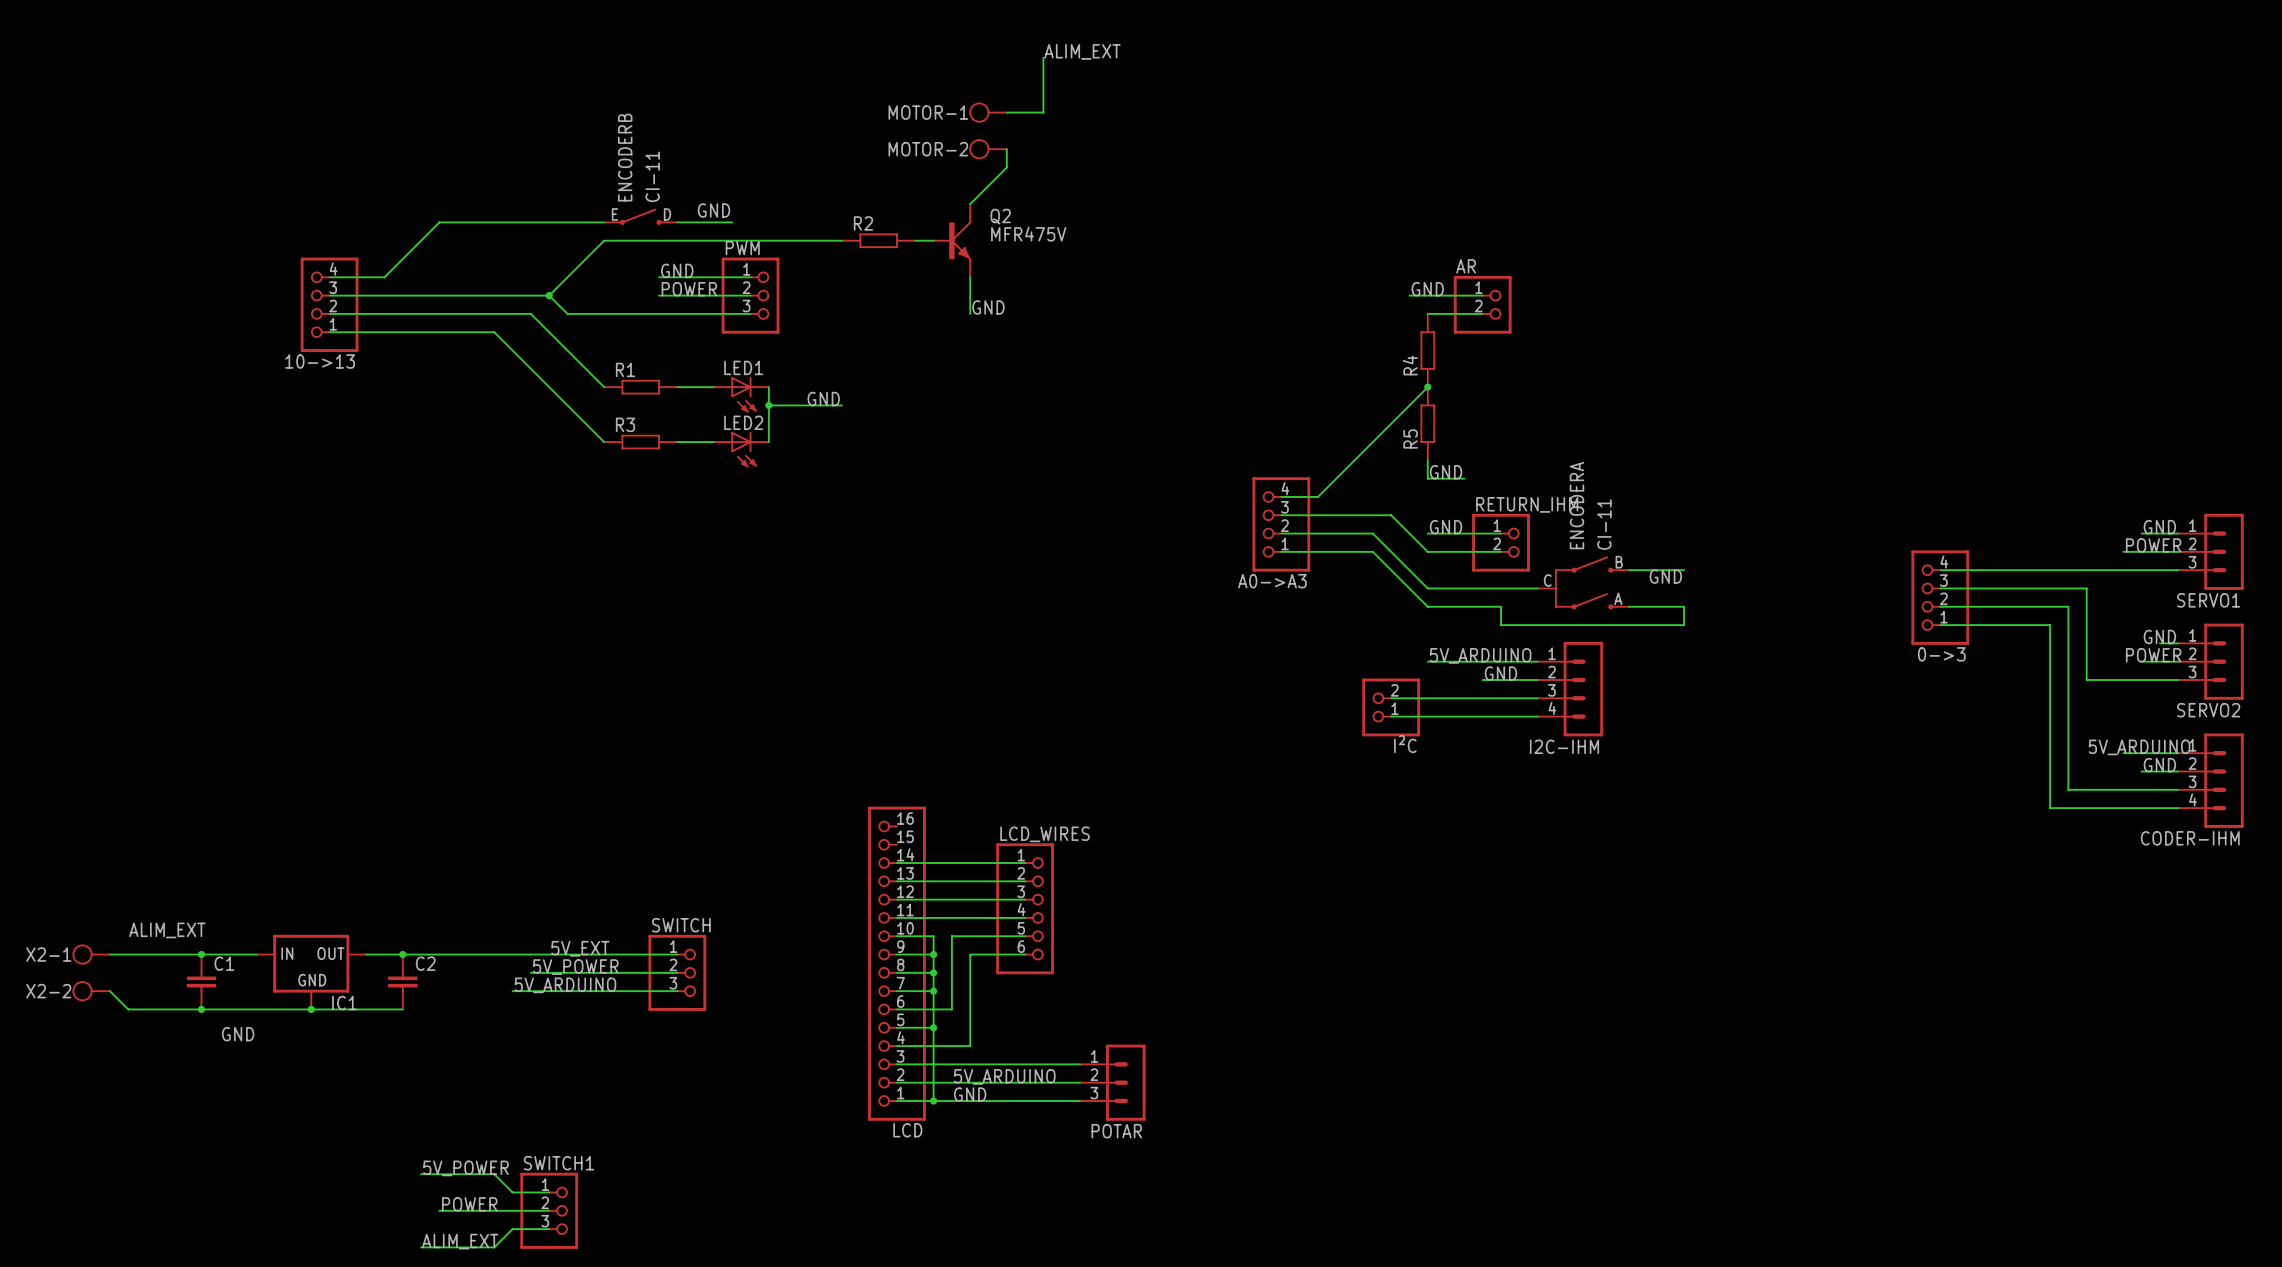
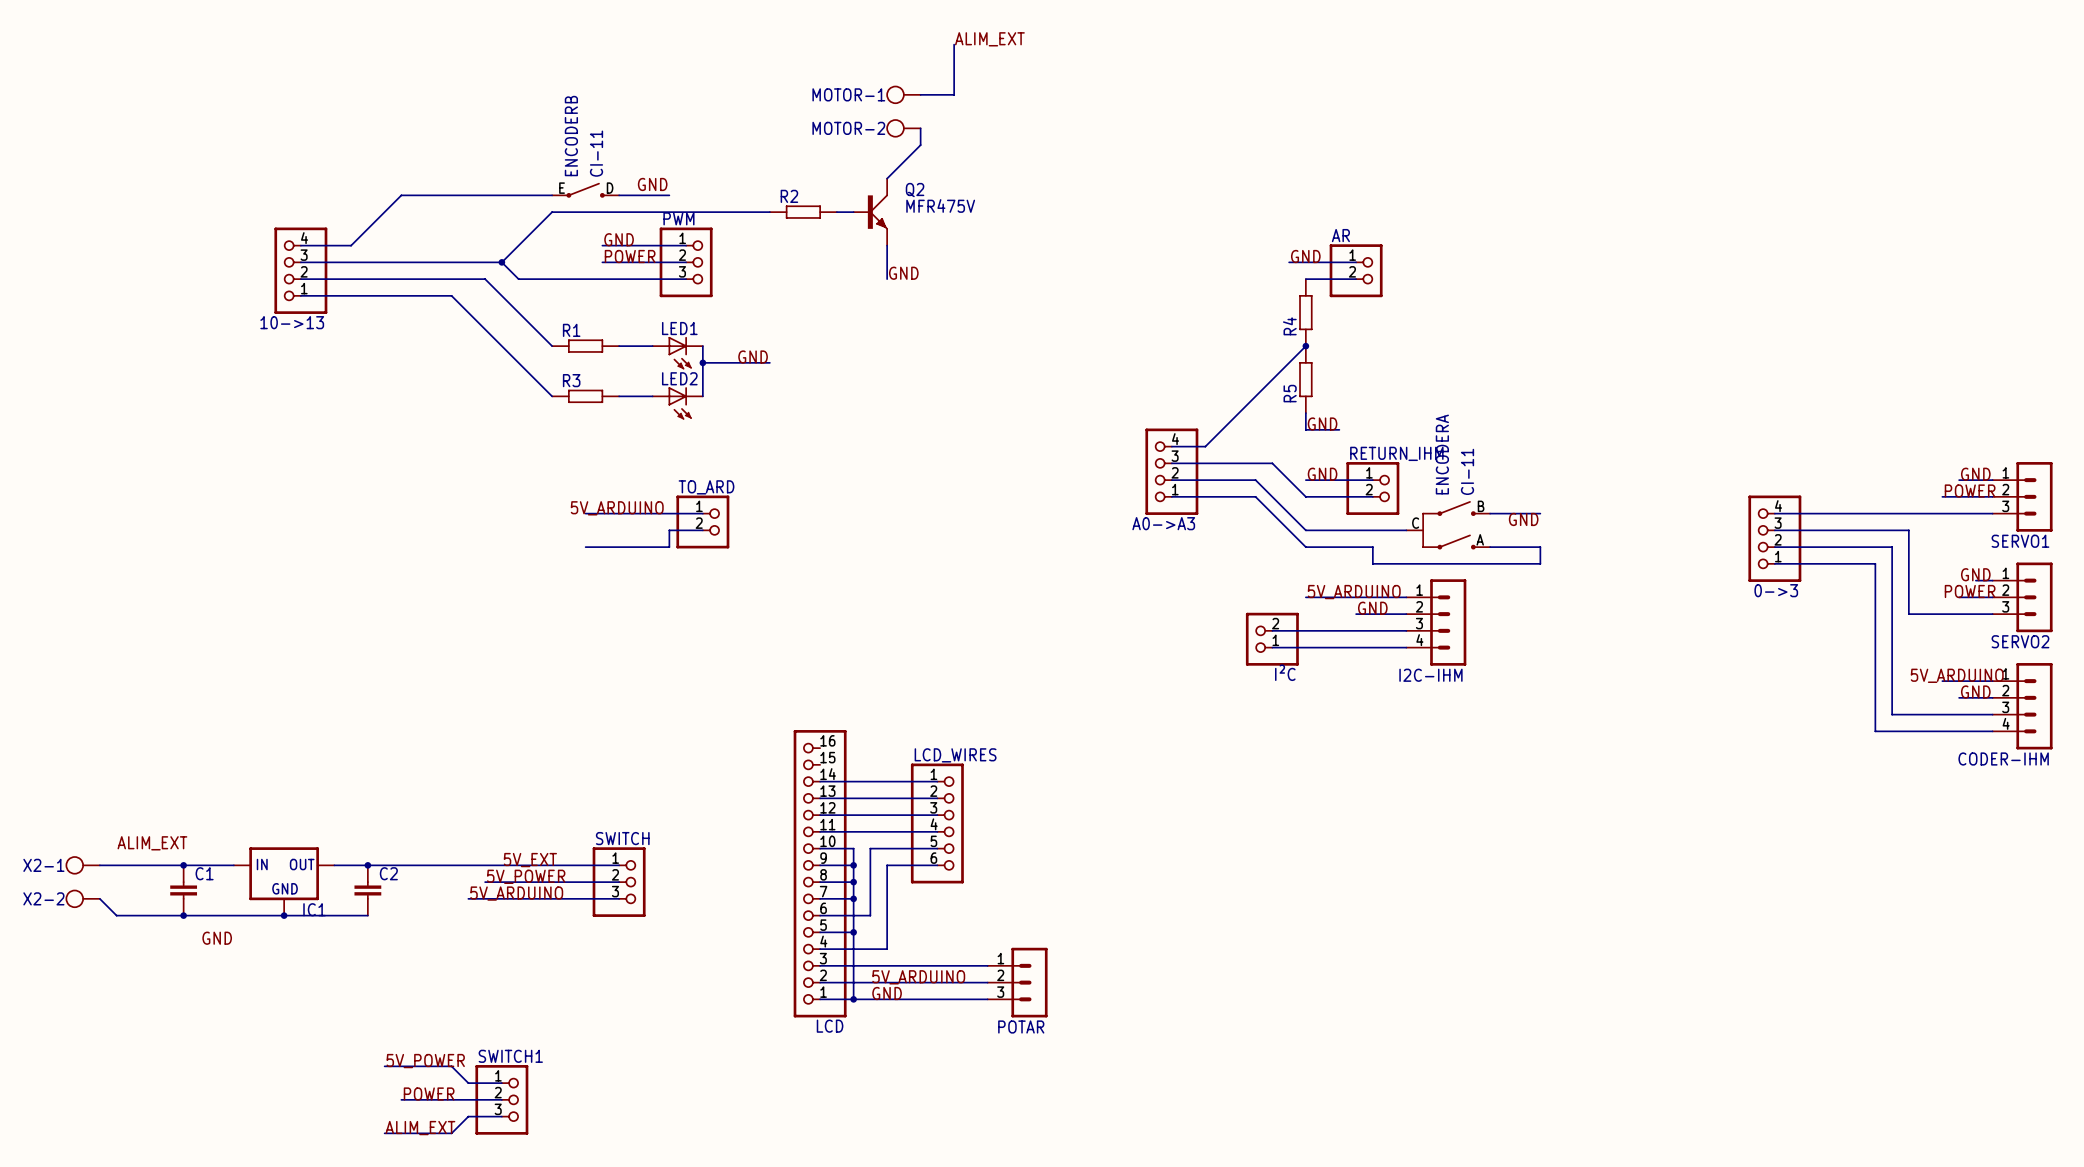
label: none -> 5V_ARDUINO (617, 508)
wire: none -> (585, 513) (702, 513)
TO_ARD: none -> (702, 521)
wire: none -> (702, 530) (669, 530) (669, 547) (585, 547)

